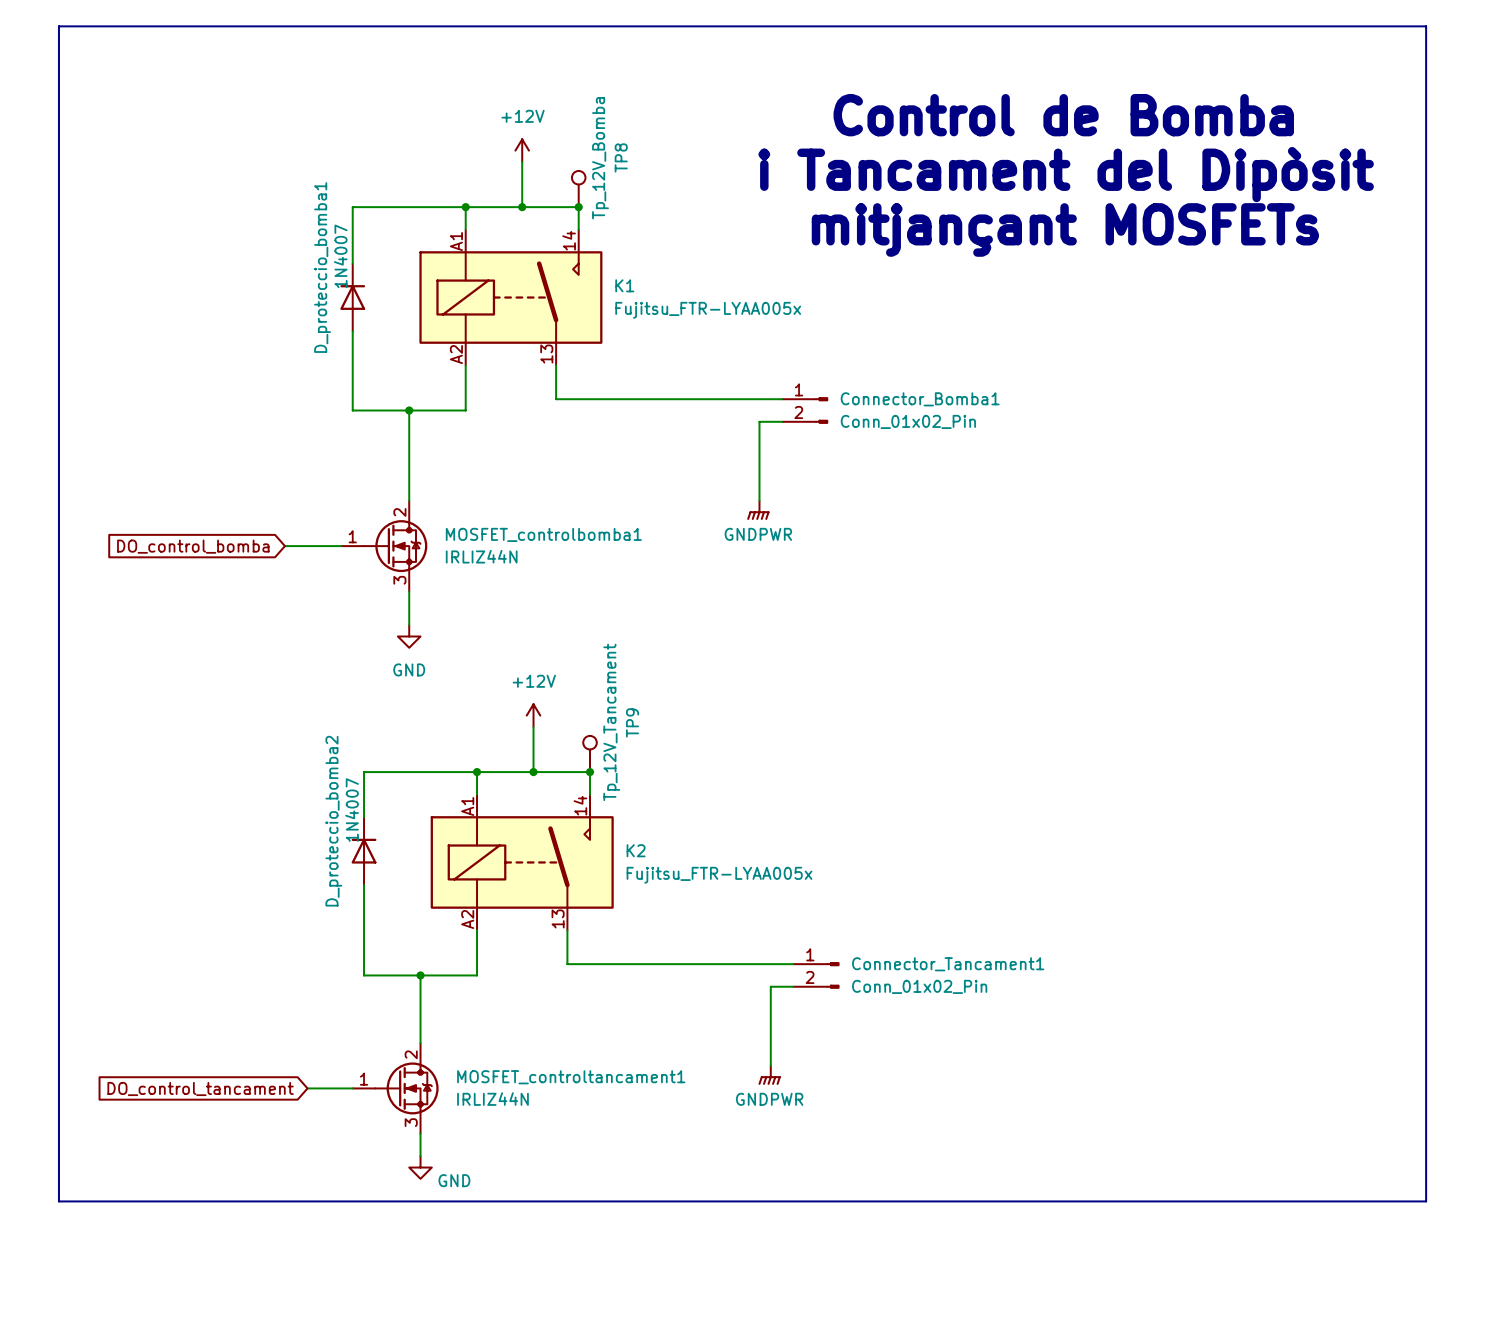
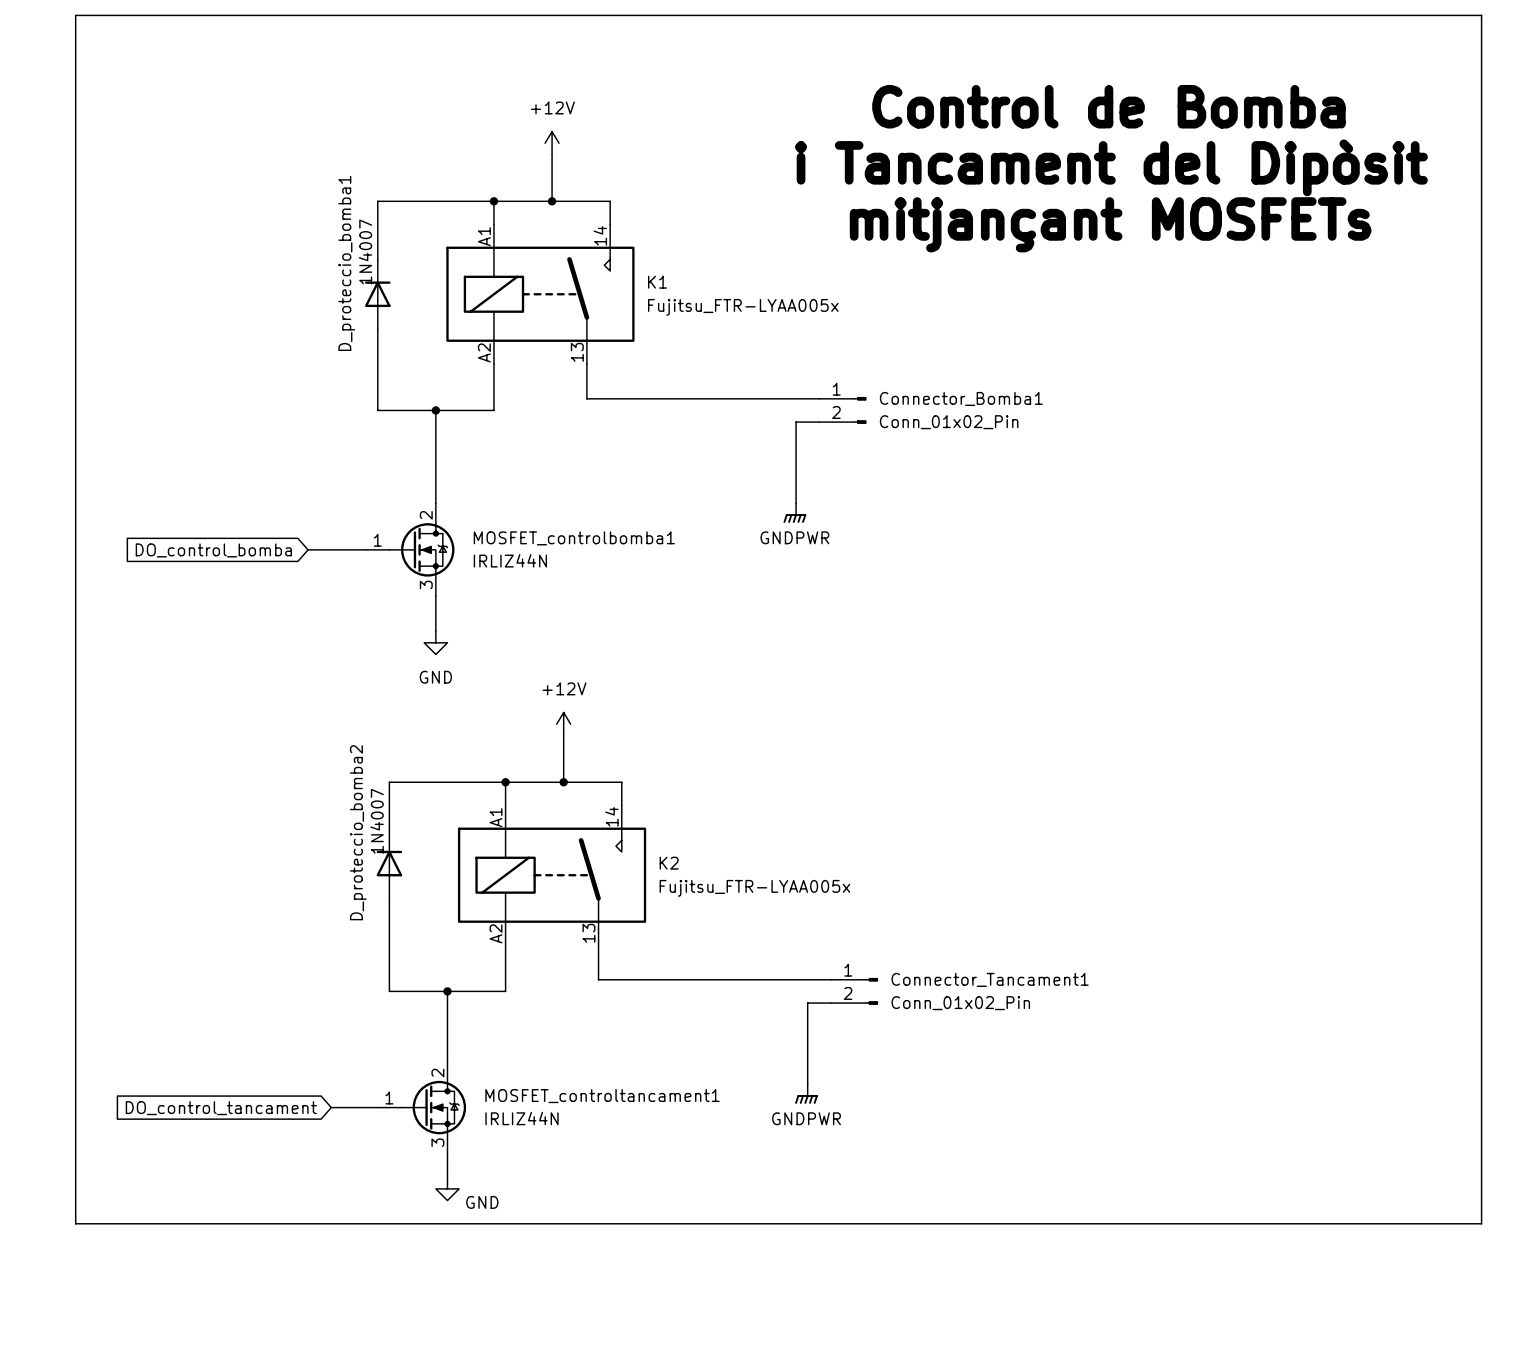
TP8: Tp_12V_Bomba (578, 189) -> none
junction: (578, 207) -> none
TP9: Tp_12V_Tancament (590, 753) -> none
junction: (590, 772) -> none

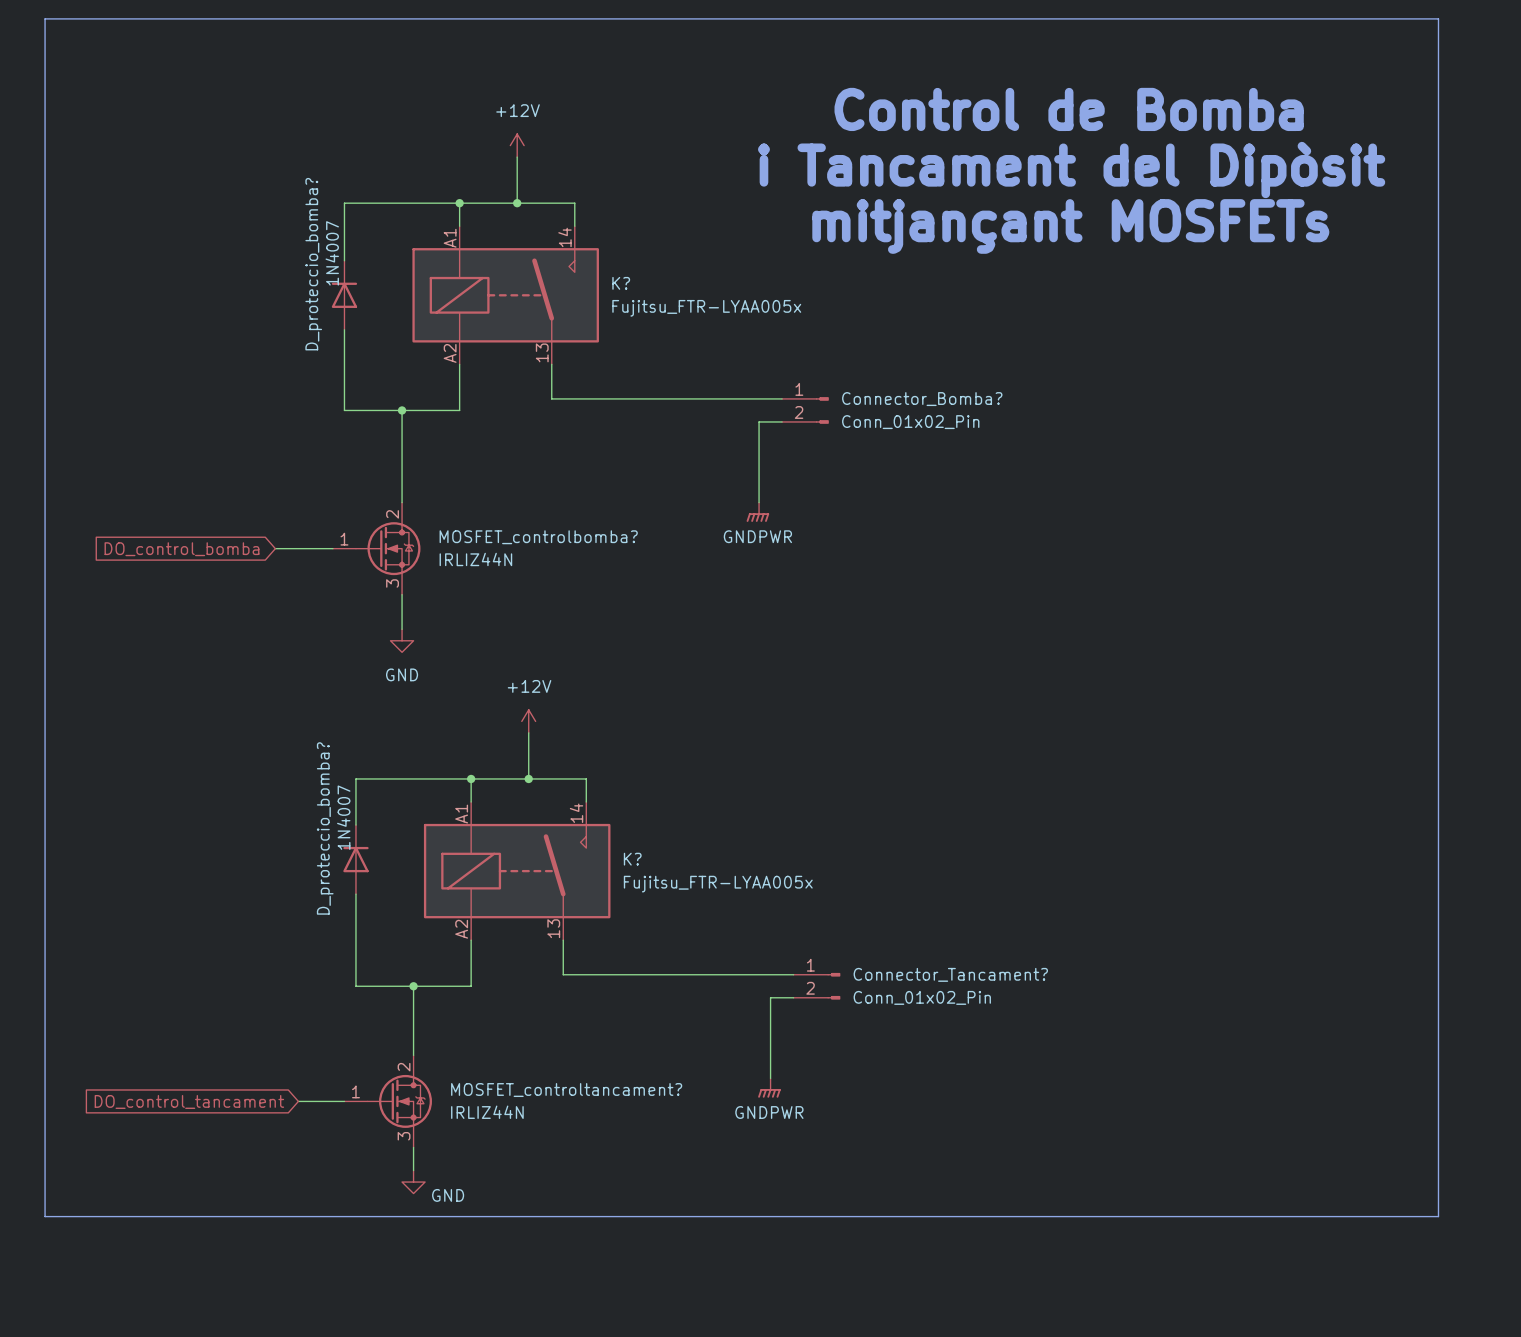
D_proteccio_bomba1 name: D_proteccio_bomba1 (346, 263) -> D_proteccio_bomba? (313, 264)
K1 name: K1 (657, 282) -> K? (621, 283)
Connector_Bomba1 name: Connector_Bomba1 (961, 398) -> Connector_Bomba? (922, 399)
MOSFET_controlbomba1 name: MOSFET_controlbomba1 (574, 538) -> MOSFET_controlbomba? (538, 537)
D_proteccio_bomba2 name: D_proteccio_bomba2 (358, 832) -> D_proteccio_bomba? (325, 828)
K2 name: K2 (669, 863) -> K? (632, 859)
Connector_Tancament1 name: Connector_Tancament1 (990, 979) -> Connector_Tancament? (950, 974)
MOSFET_controltancament1 name: MOSFET_controltancament1 (602, 1096) -> MOSFET_controltancament? (566, 1090)

